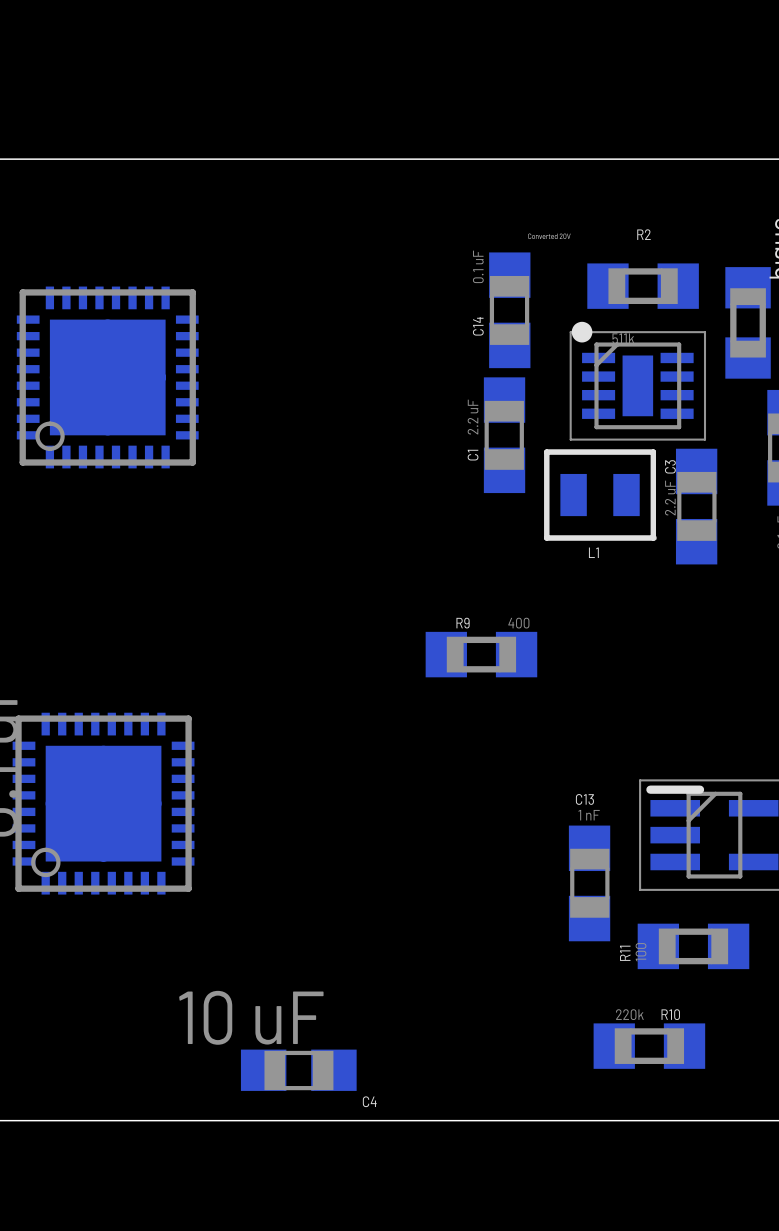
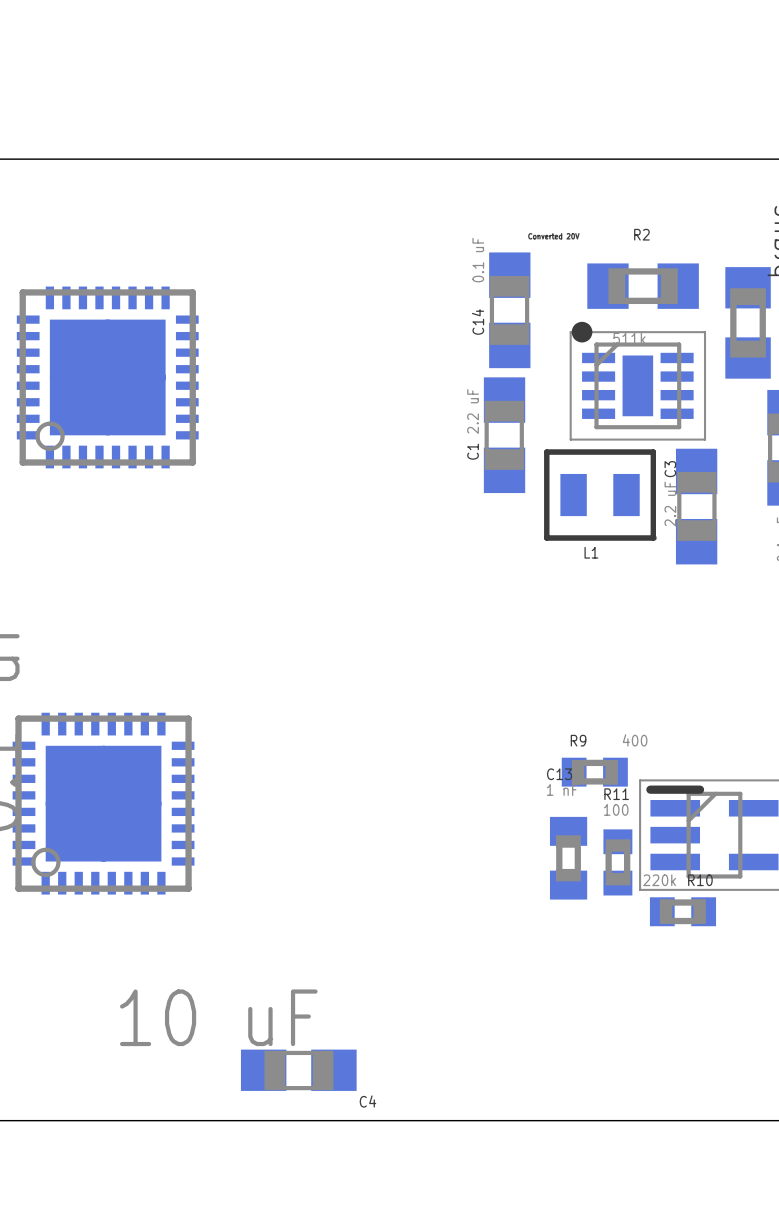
R9 footprint: [425, 631, 538, 678] -> [561, 757, 628, 787]
C13 footprint: [568, 825, 611, 942] -> [549, 816, 588, 900]
R11 footprint: [637, 923, 750, 970] -> [603, 829, 633, 896]
R11 name position: R11 (625, 953) -> R11 (616, 794)
R10 footprint: [593, 1023, 706, 1069] -> [649, 897, 717, 927]

